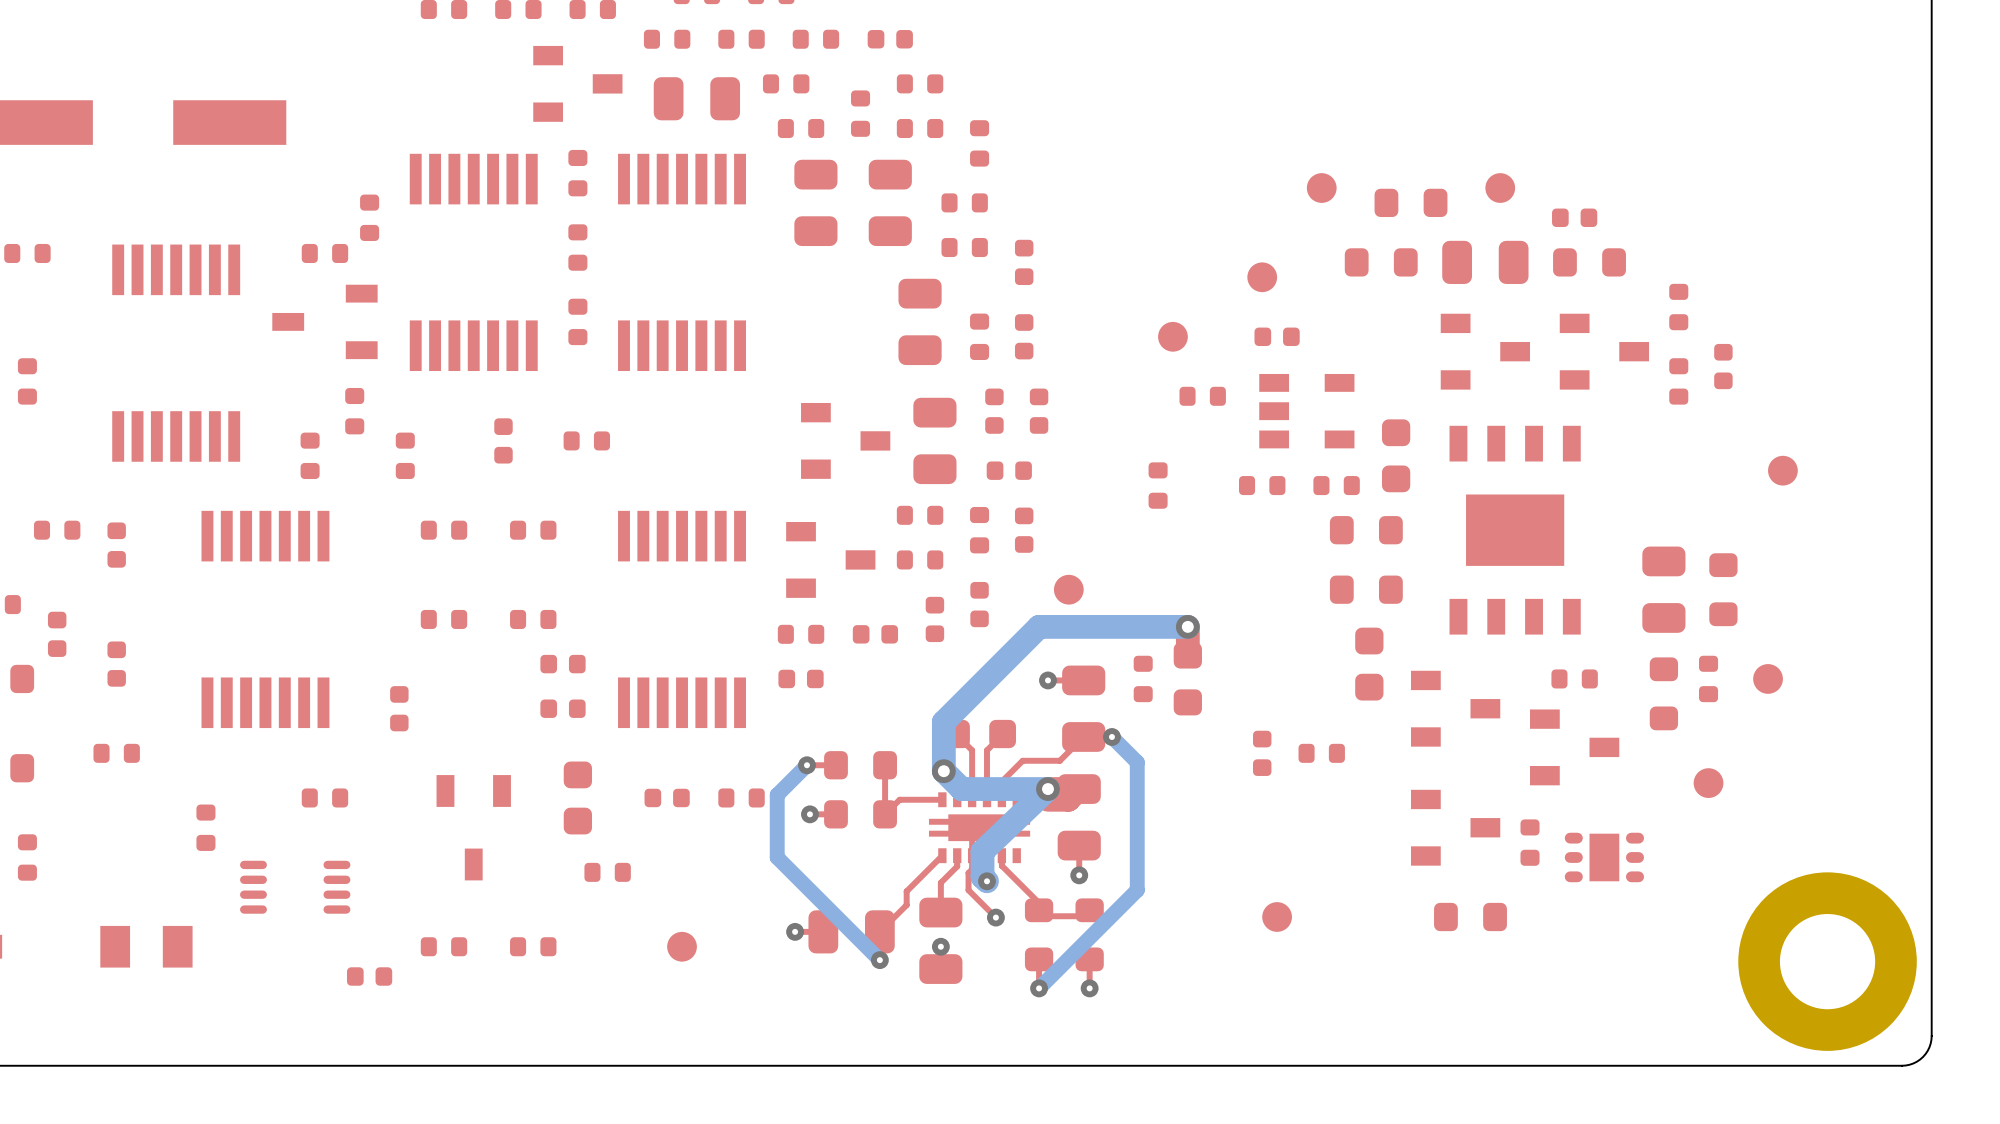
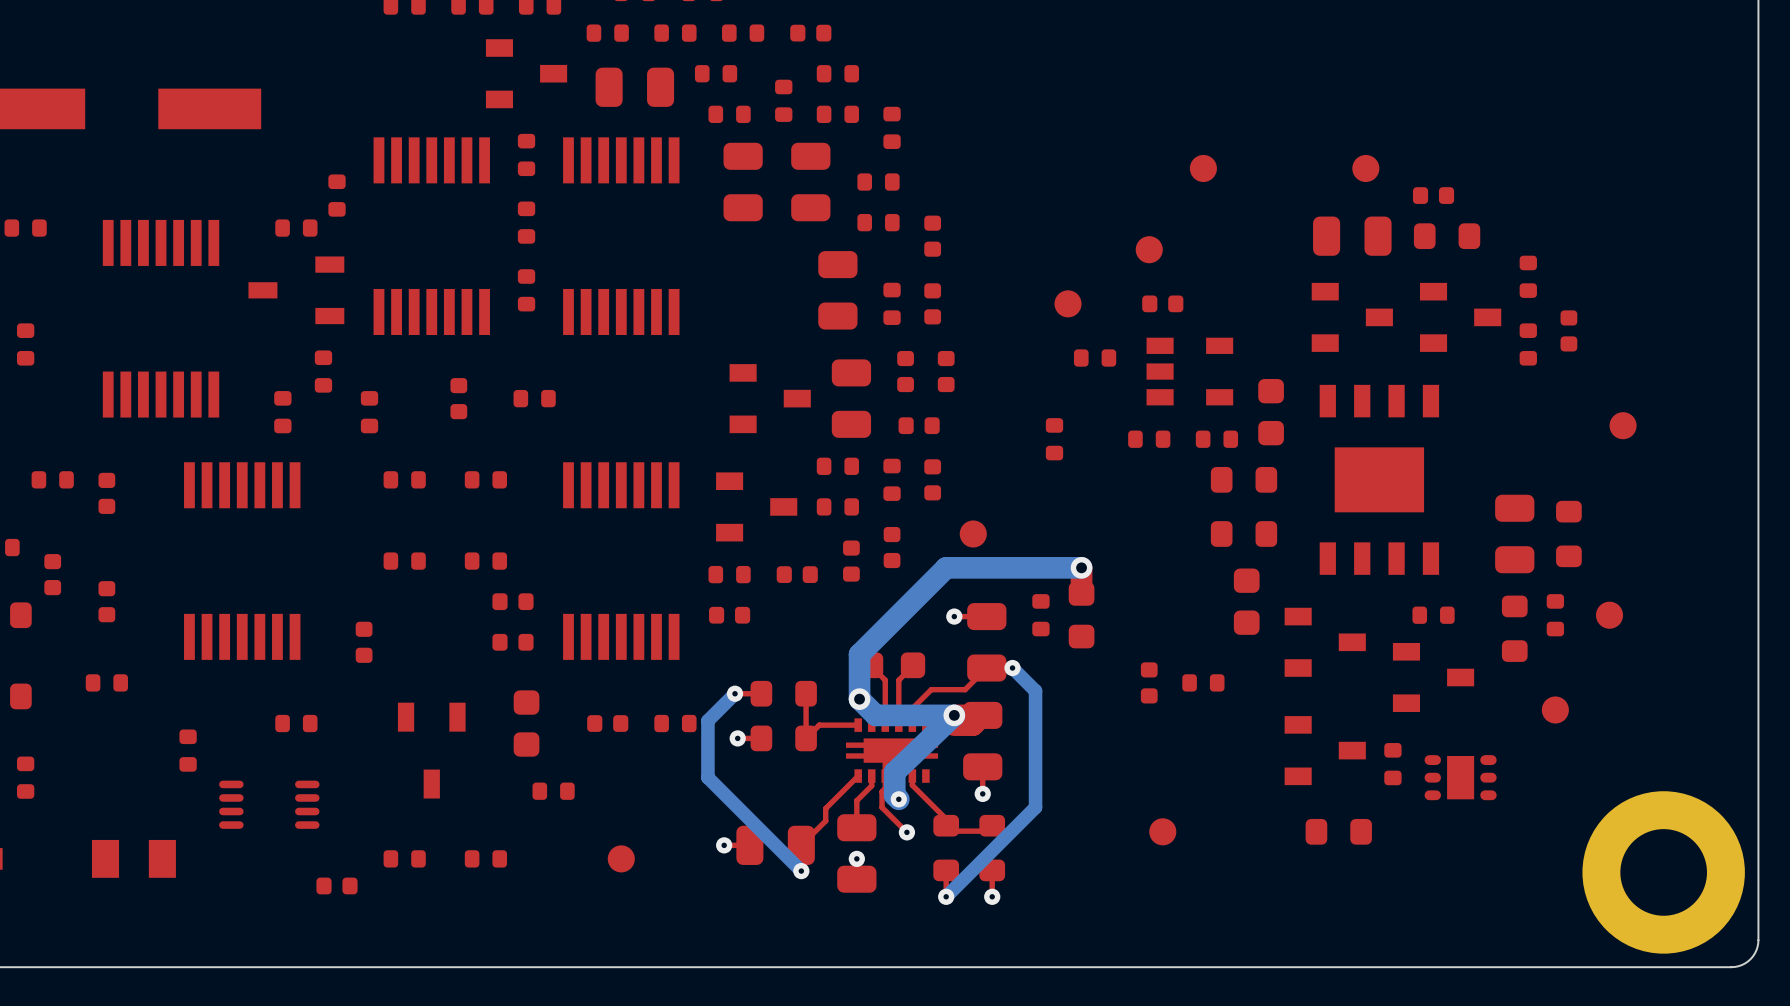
part: (1410, 202) -> none
part: (1381, 262) -> none

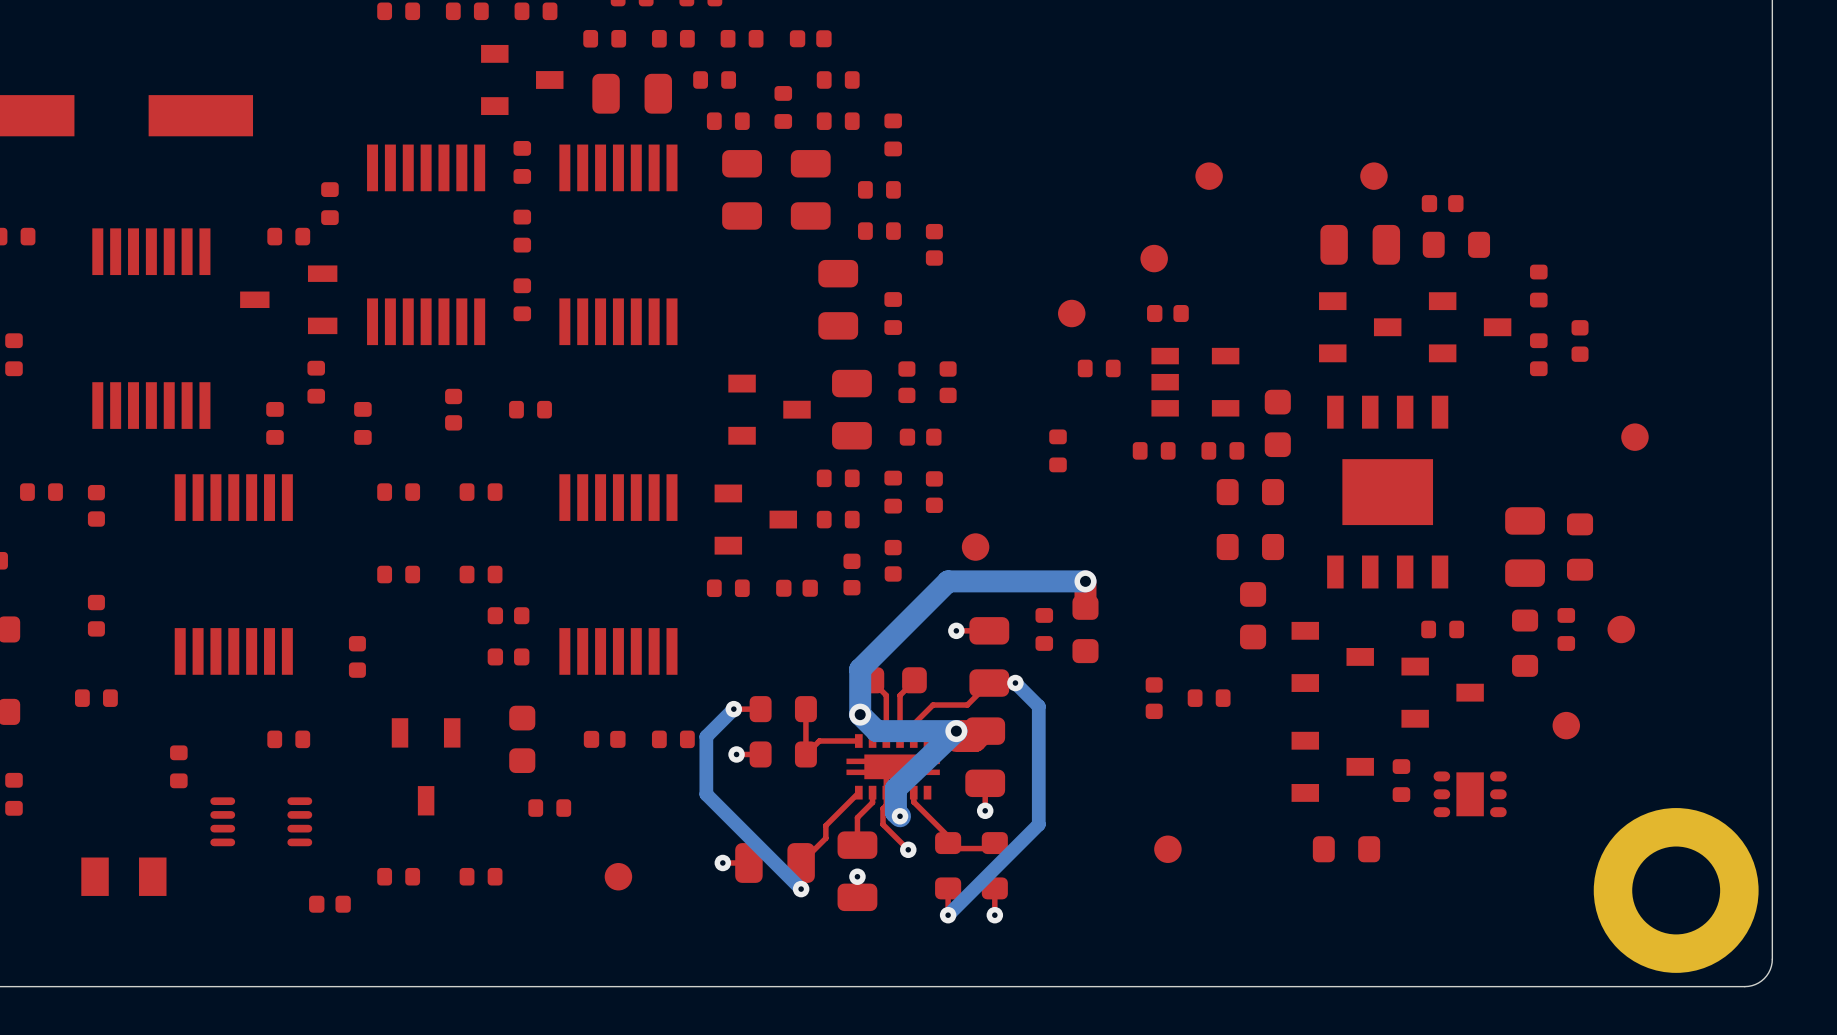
part: (932, 303) -> none
part: (52, 574) -> none
part: (729, 615) -> none

